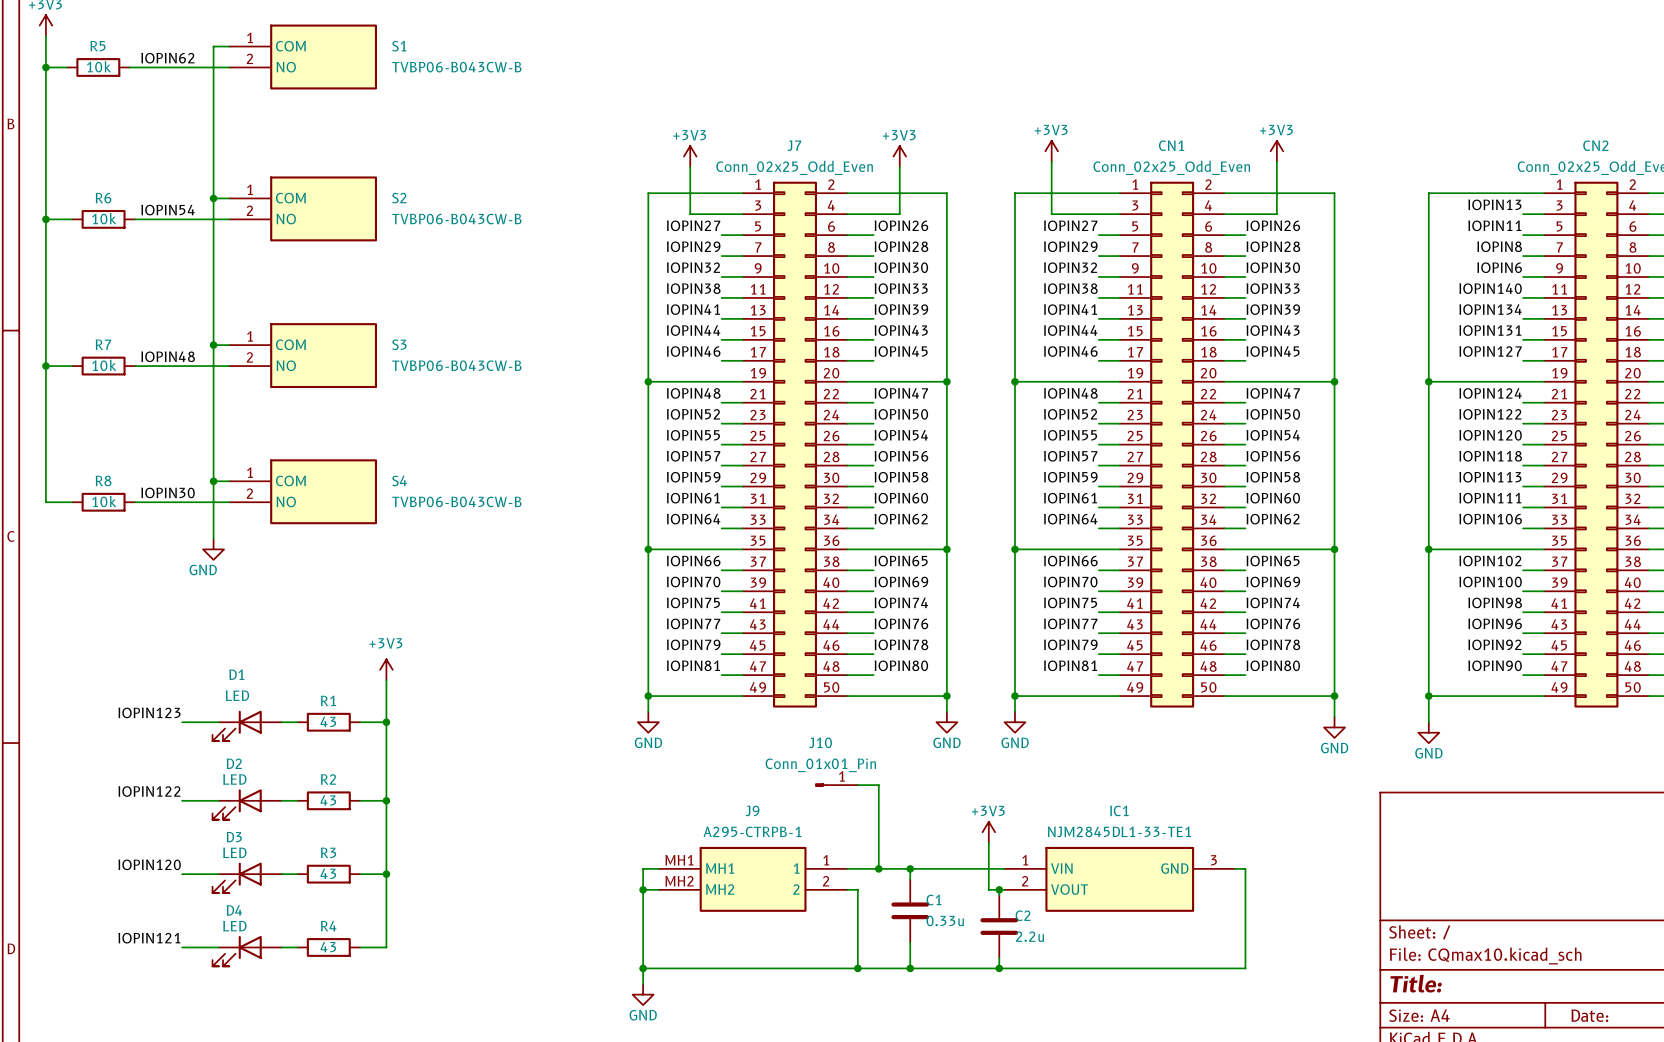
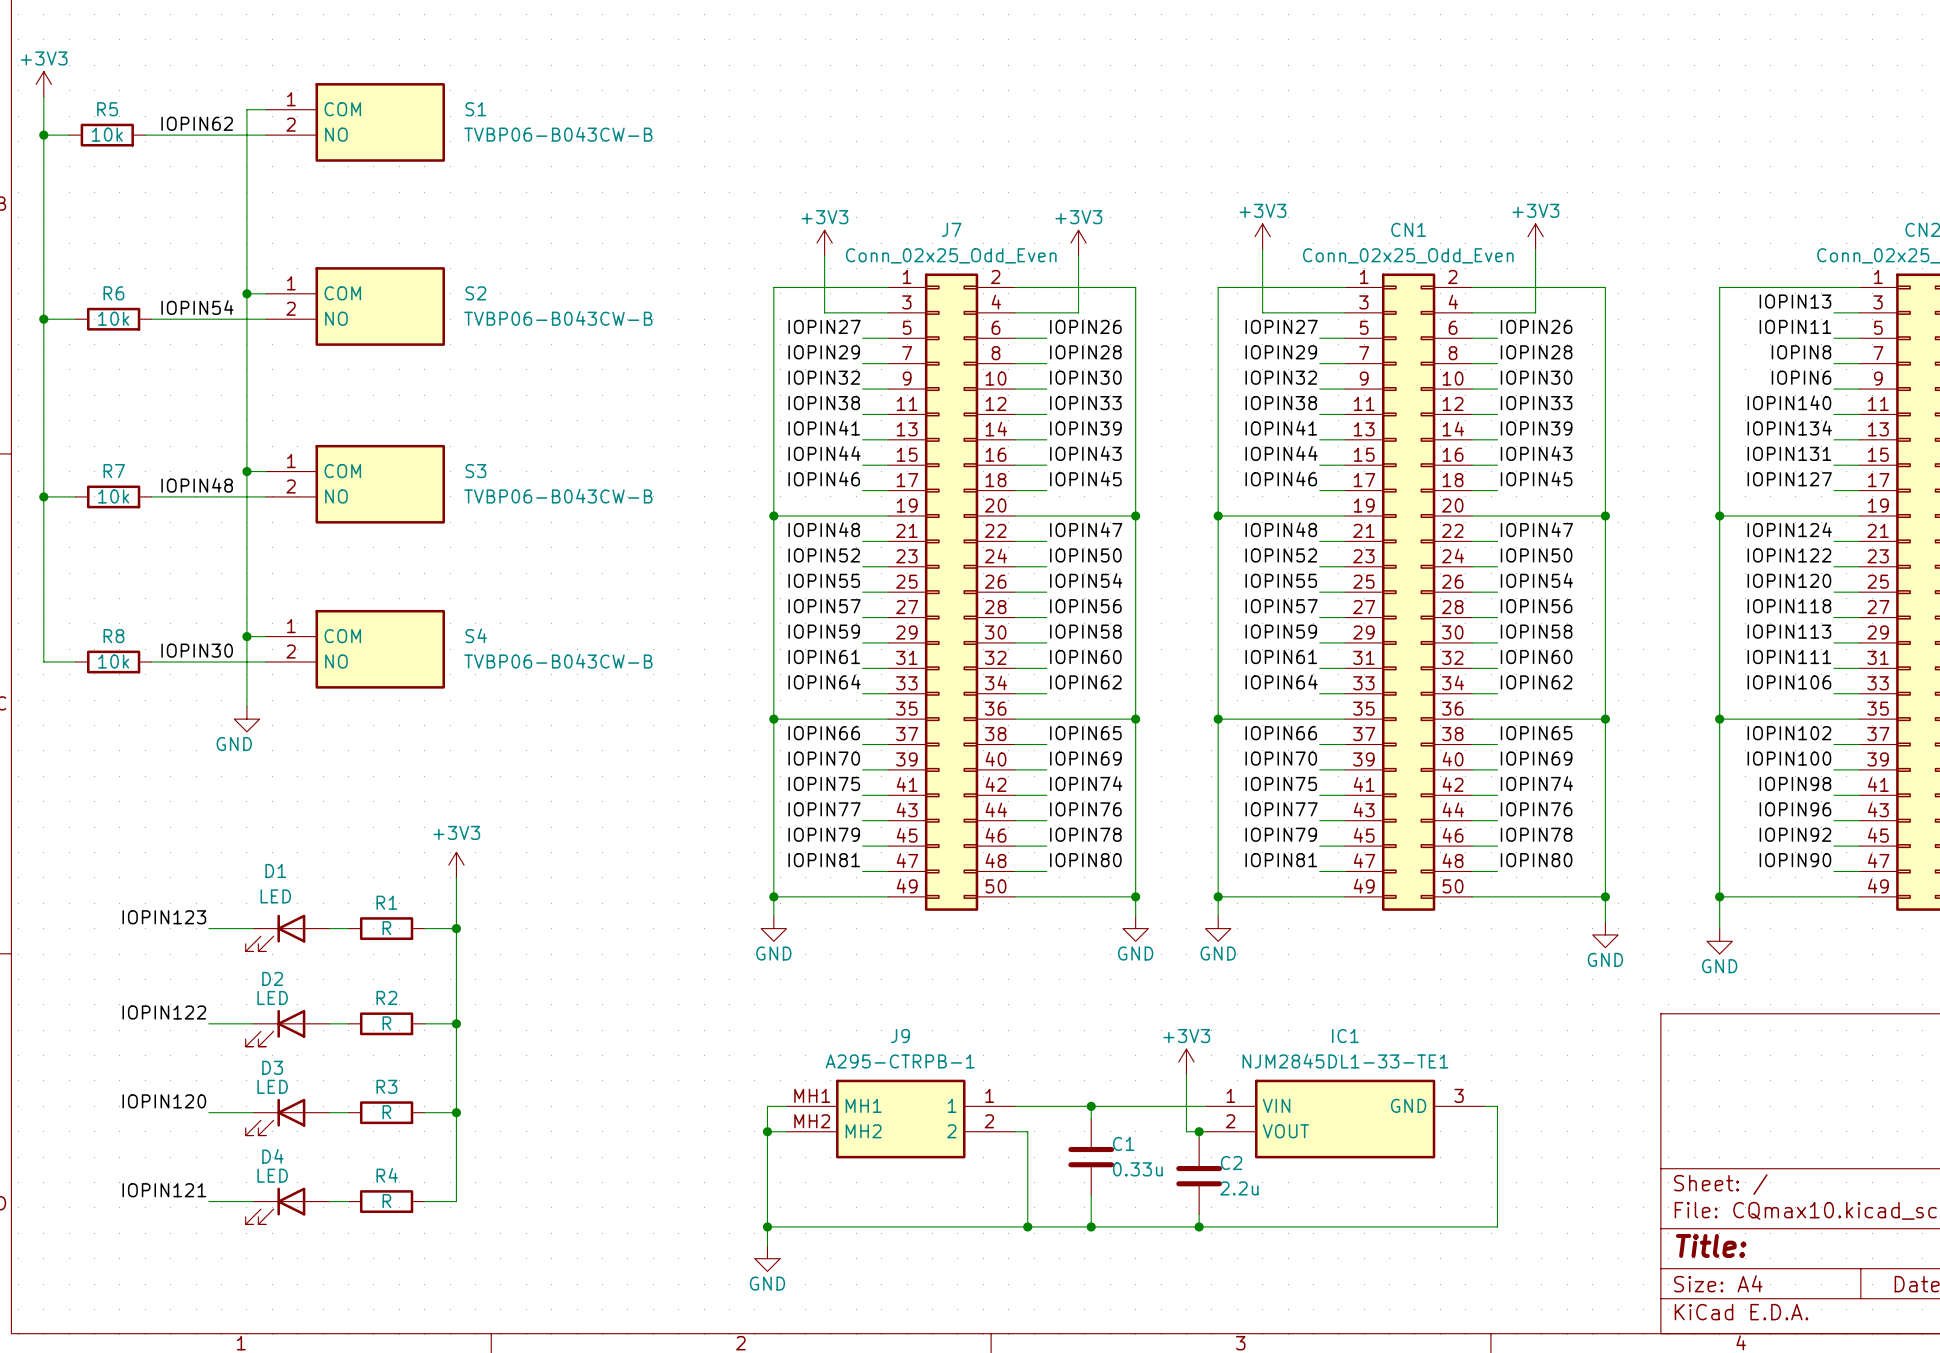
R1 value: 43 (328, 721) -> R (386, 928)
J10: Conn_01x01_Pin (836, 785) -> none
wire: (857, 785) (878, 785) (878, 868) -> none
R2 value: 43 (328, 800) -> R (386, 1023)
junction: (878, 868) -> none
R3 value: 43 (328, 873) -> R (386, 1112)
R4 value: 43 (328, 947) -> R (386, 1201)

